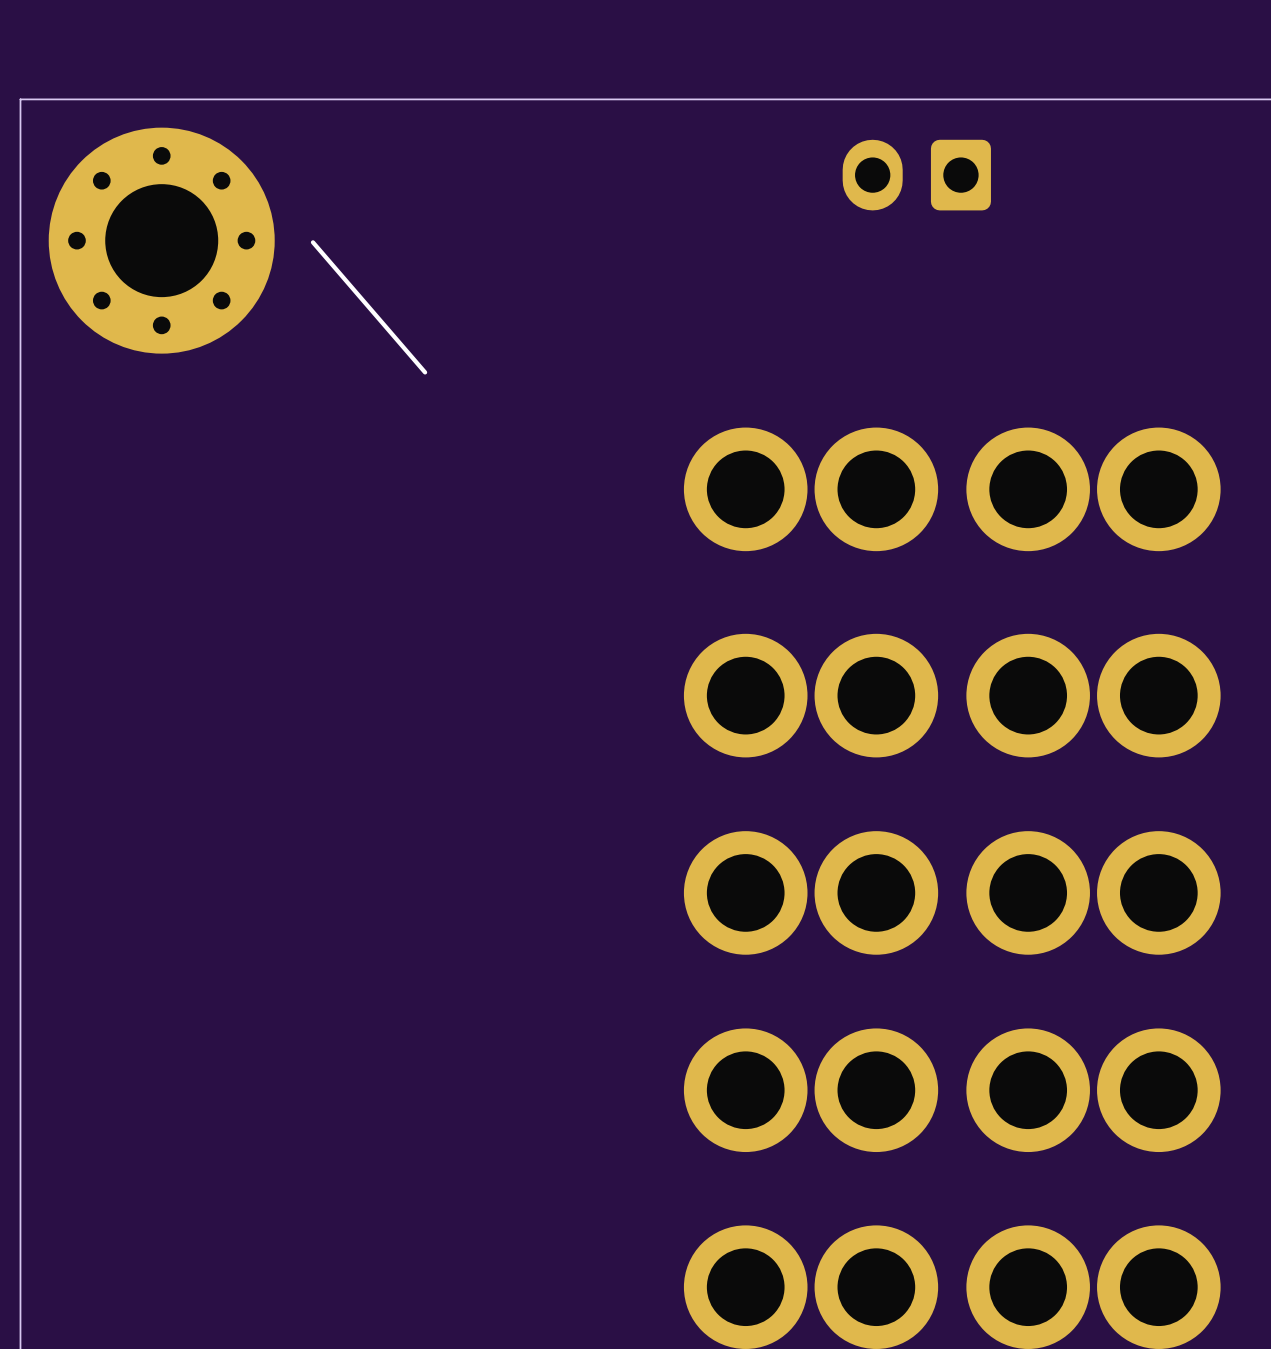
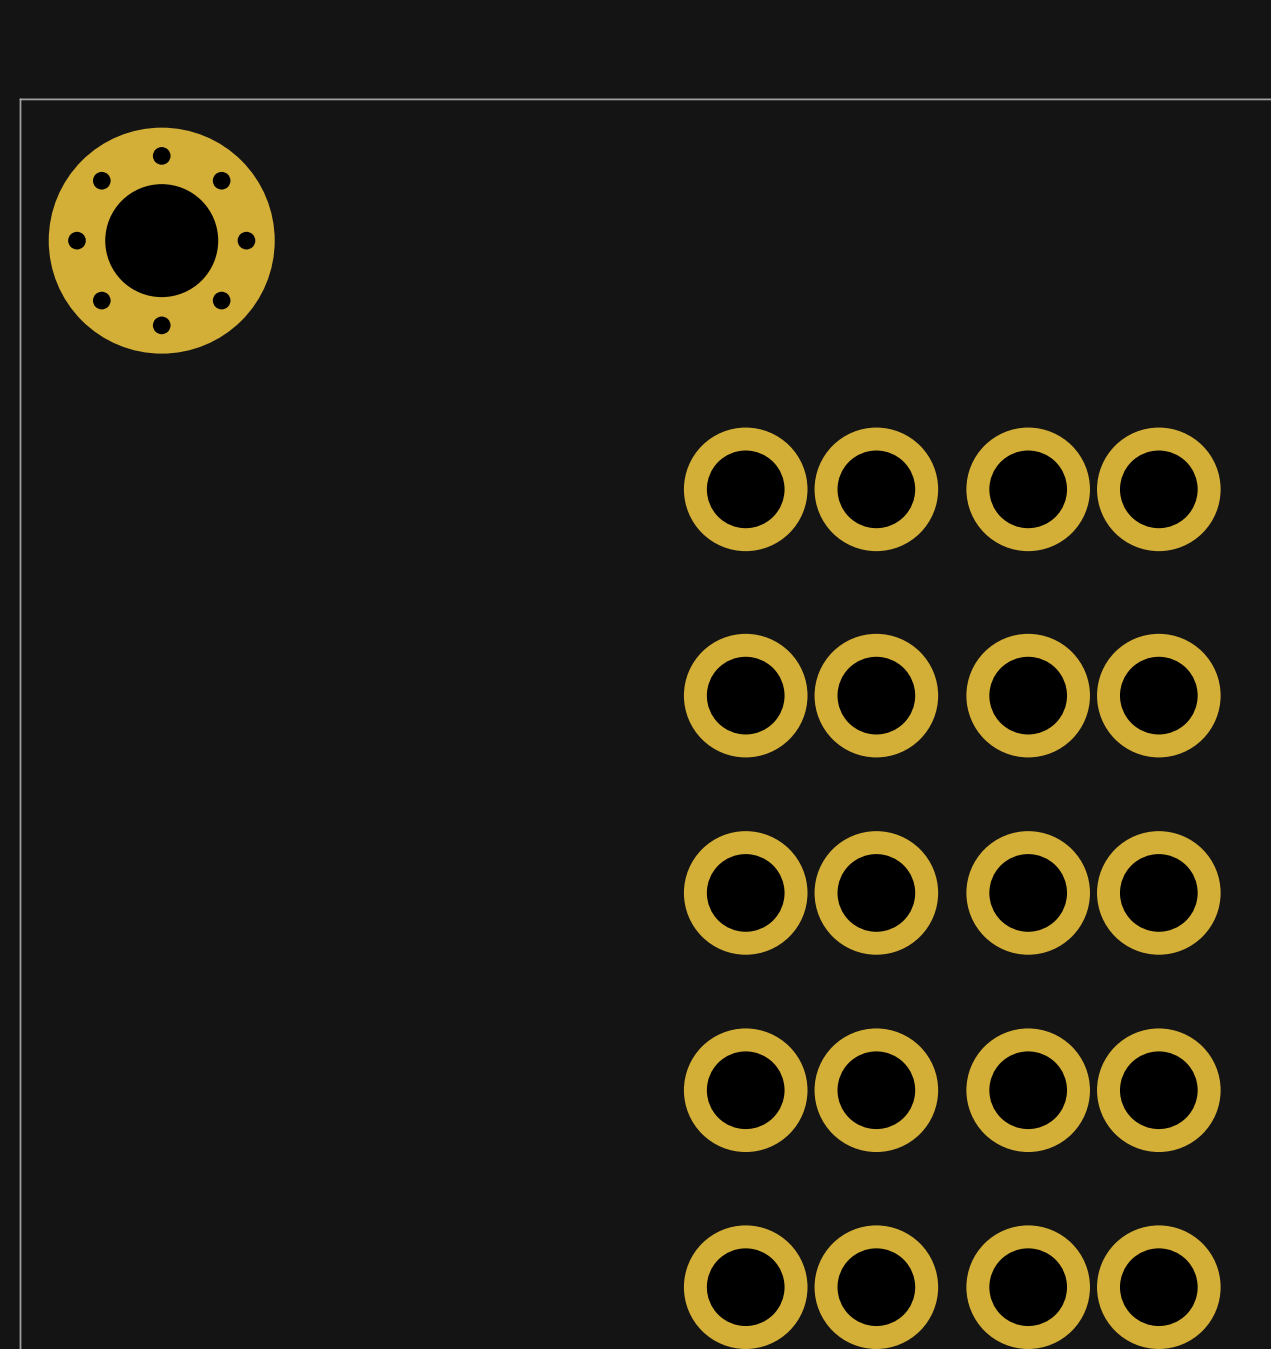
part: (916, 175) -> none
line: (312, 242) (425, 372) -> none

